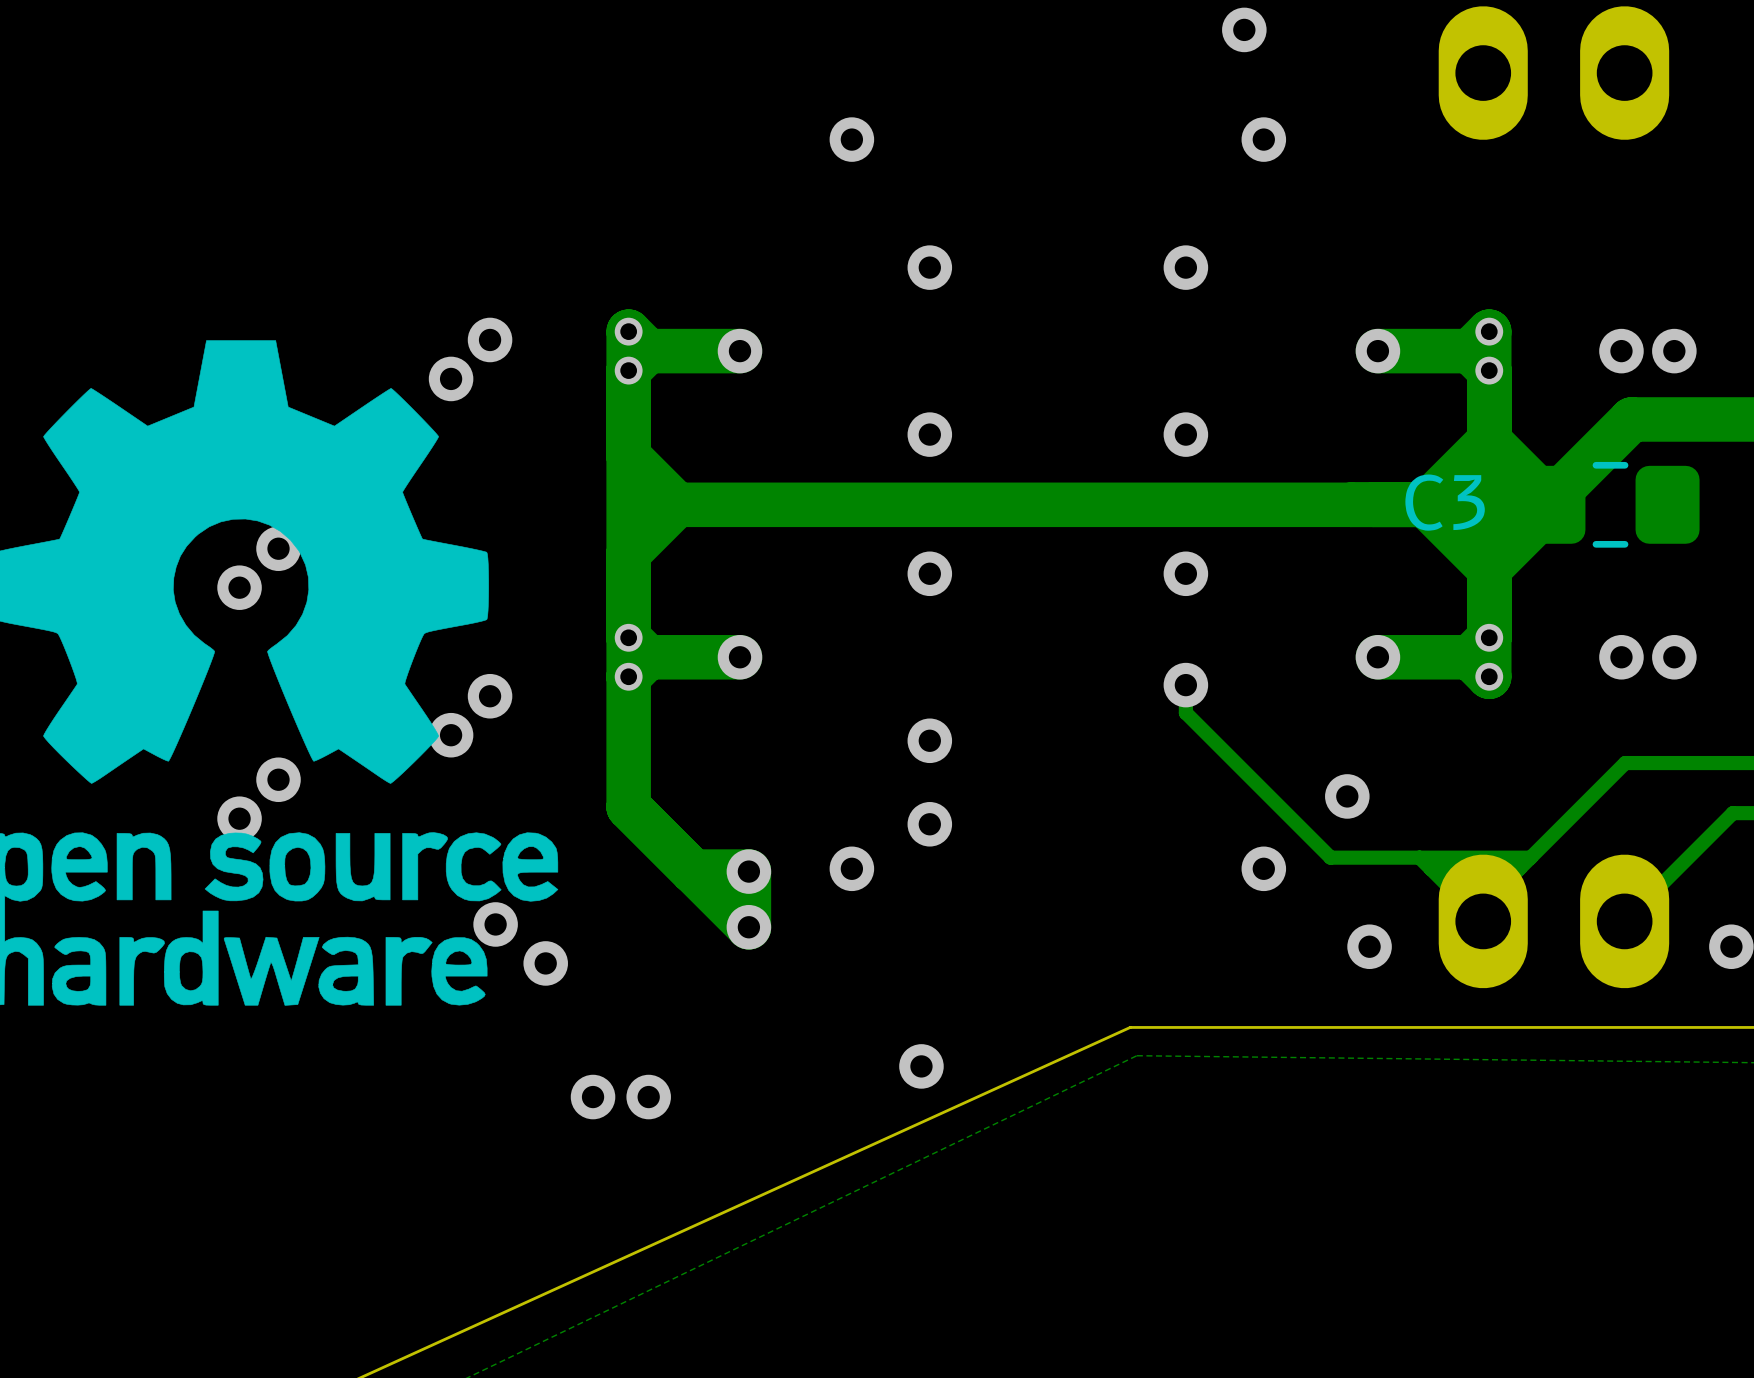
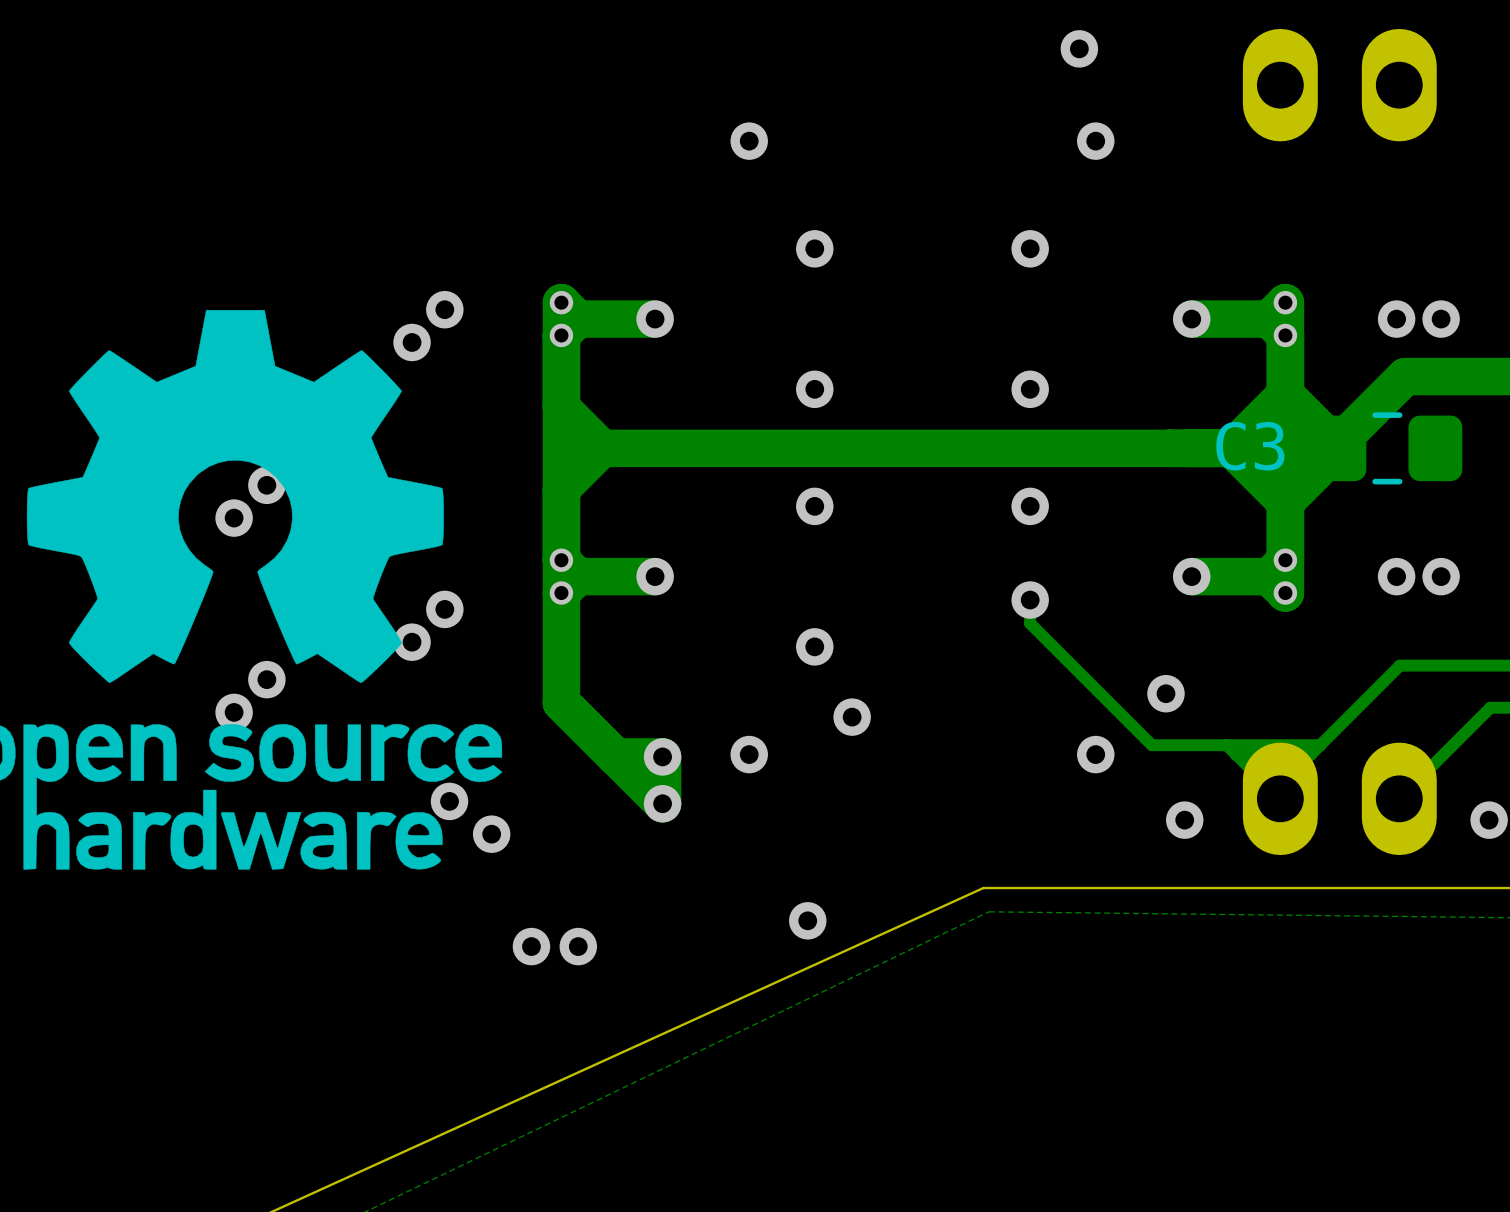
via position: (929, 824) -> (852, 717)

